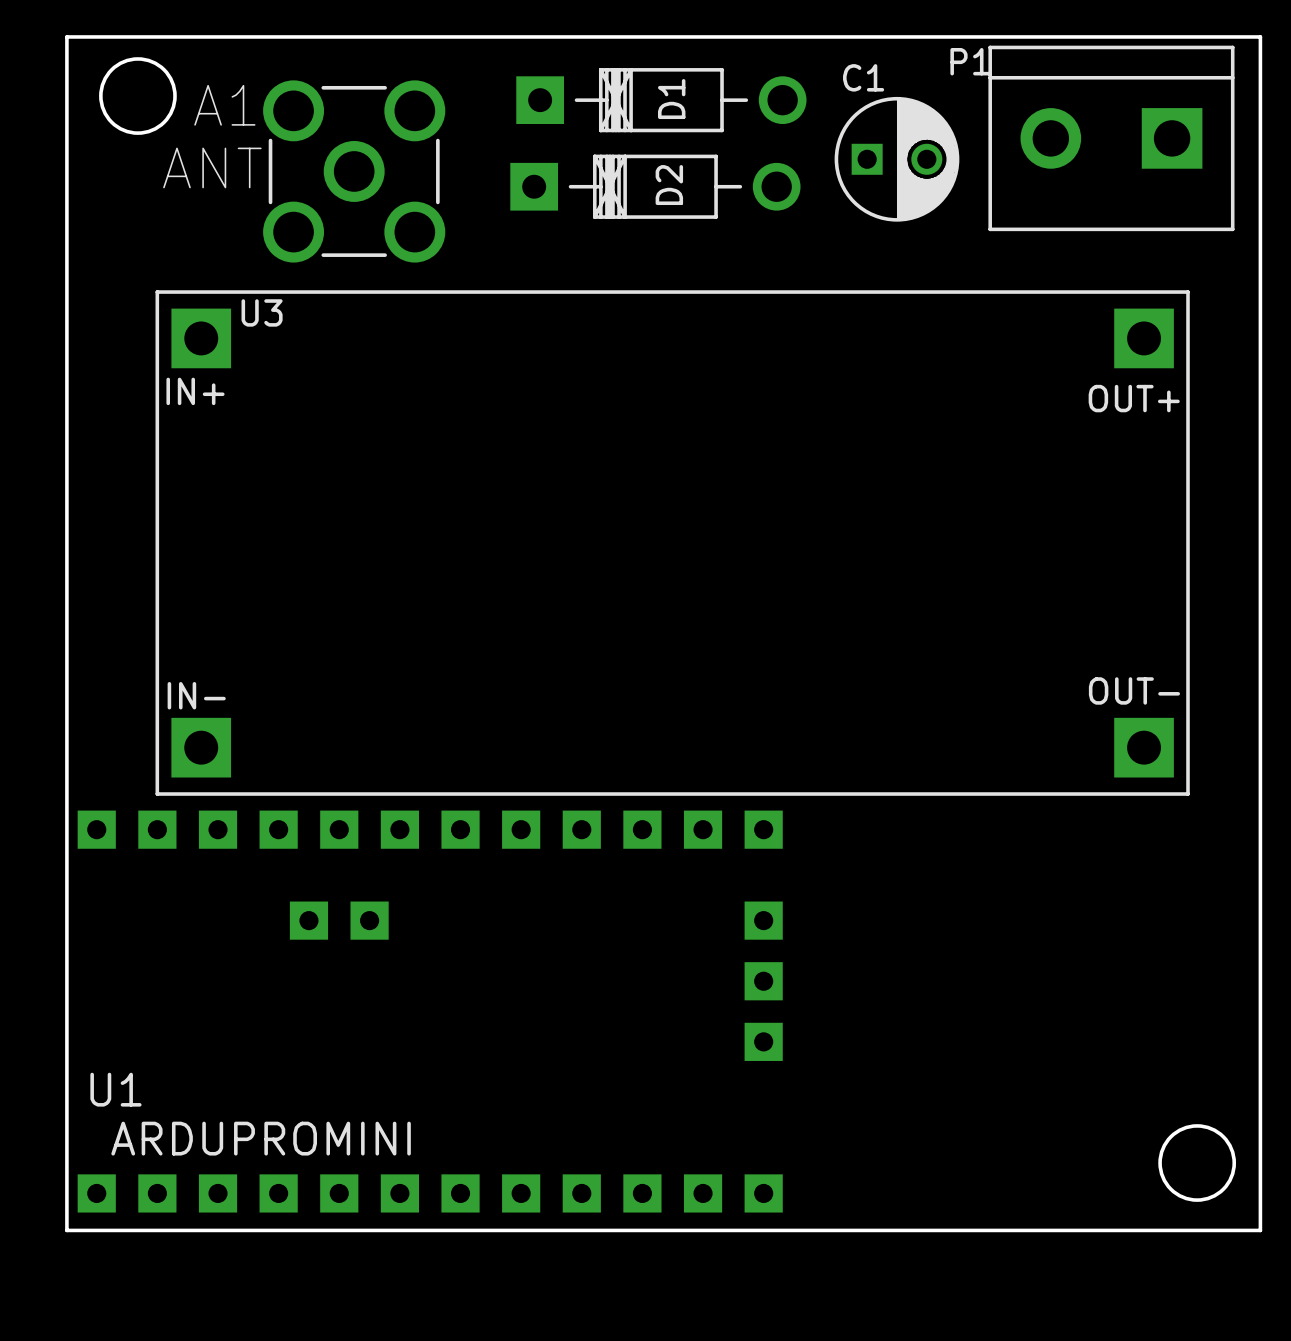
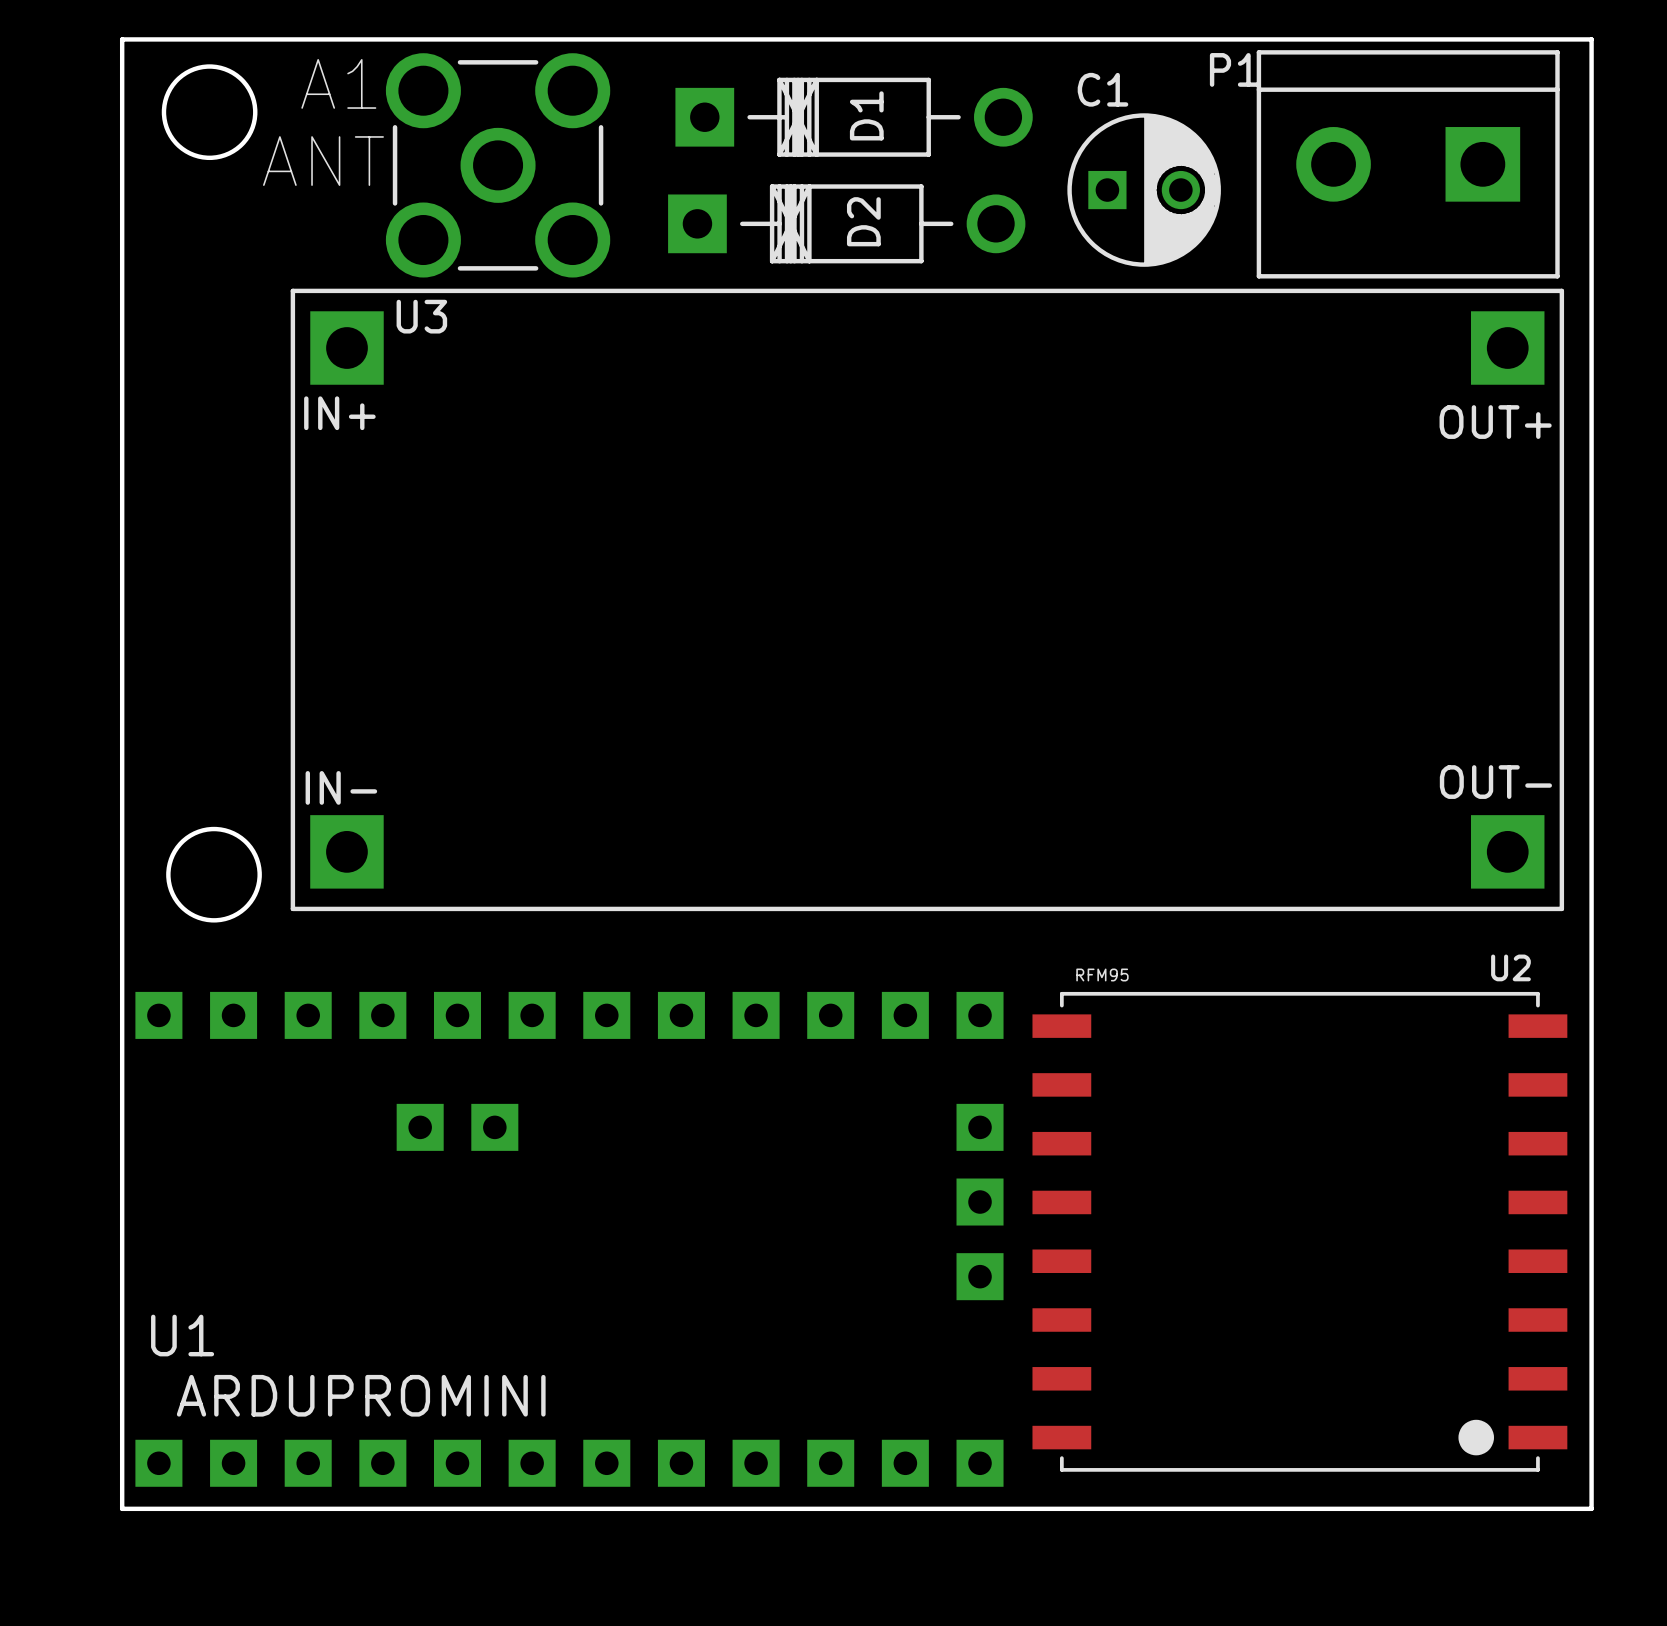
A1 position: (354, 171) -> (498, 165)
U3 position: (672, 543) -> (927, 599)
round board edge: none -> [166, 826, 262, 923]
U2: none -> RFM95 (1299, 1231)
round board edge: [1158, 1124, 1237, 1202] -> none

